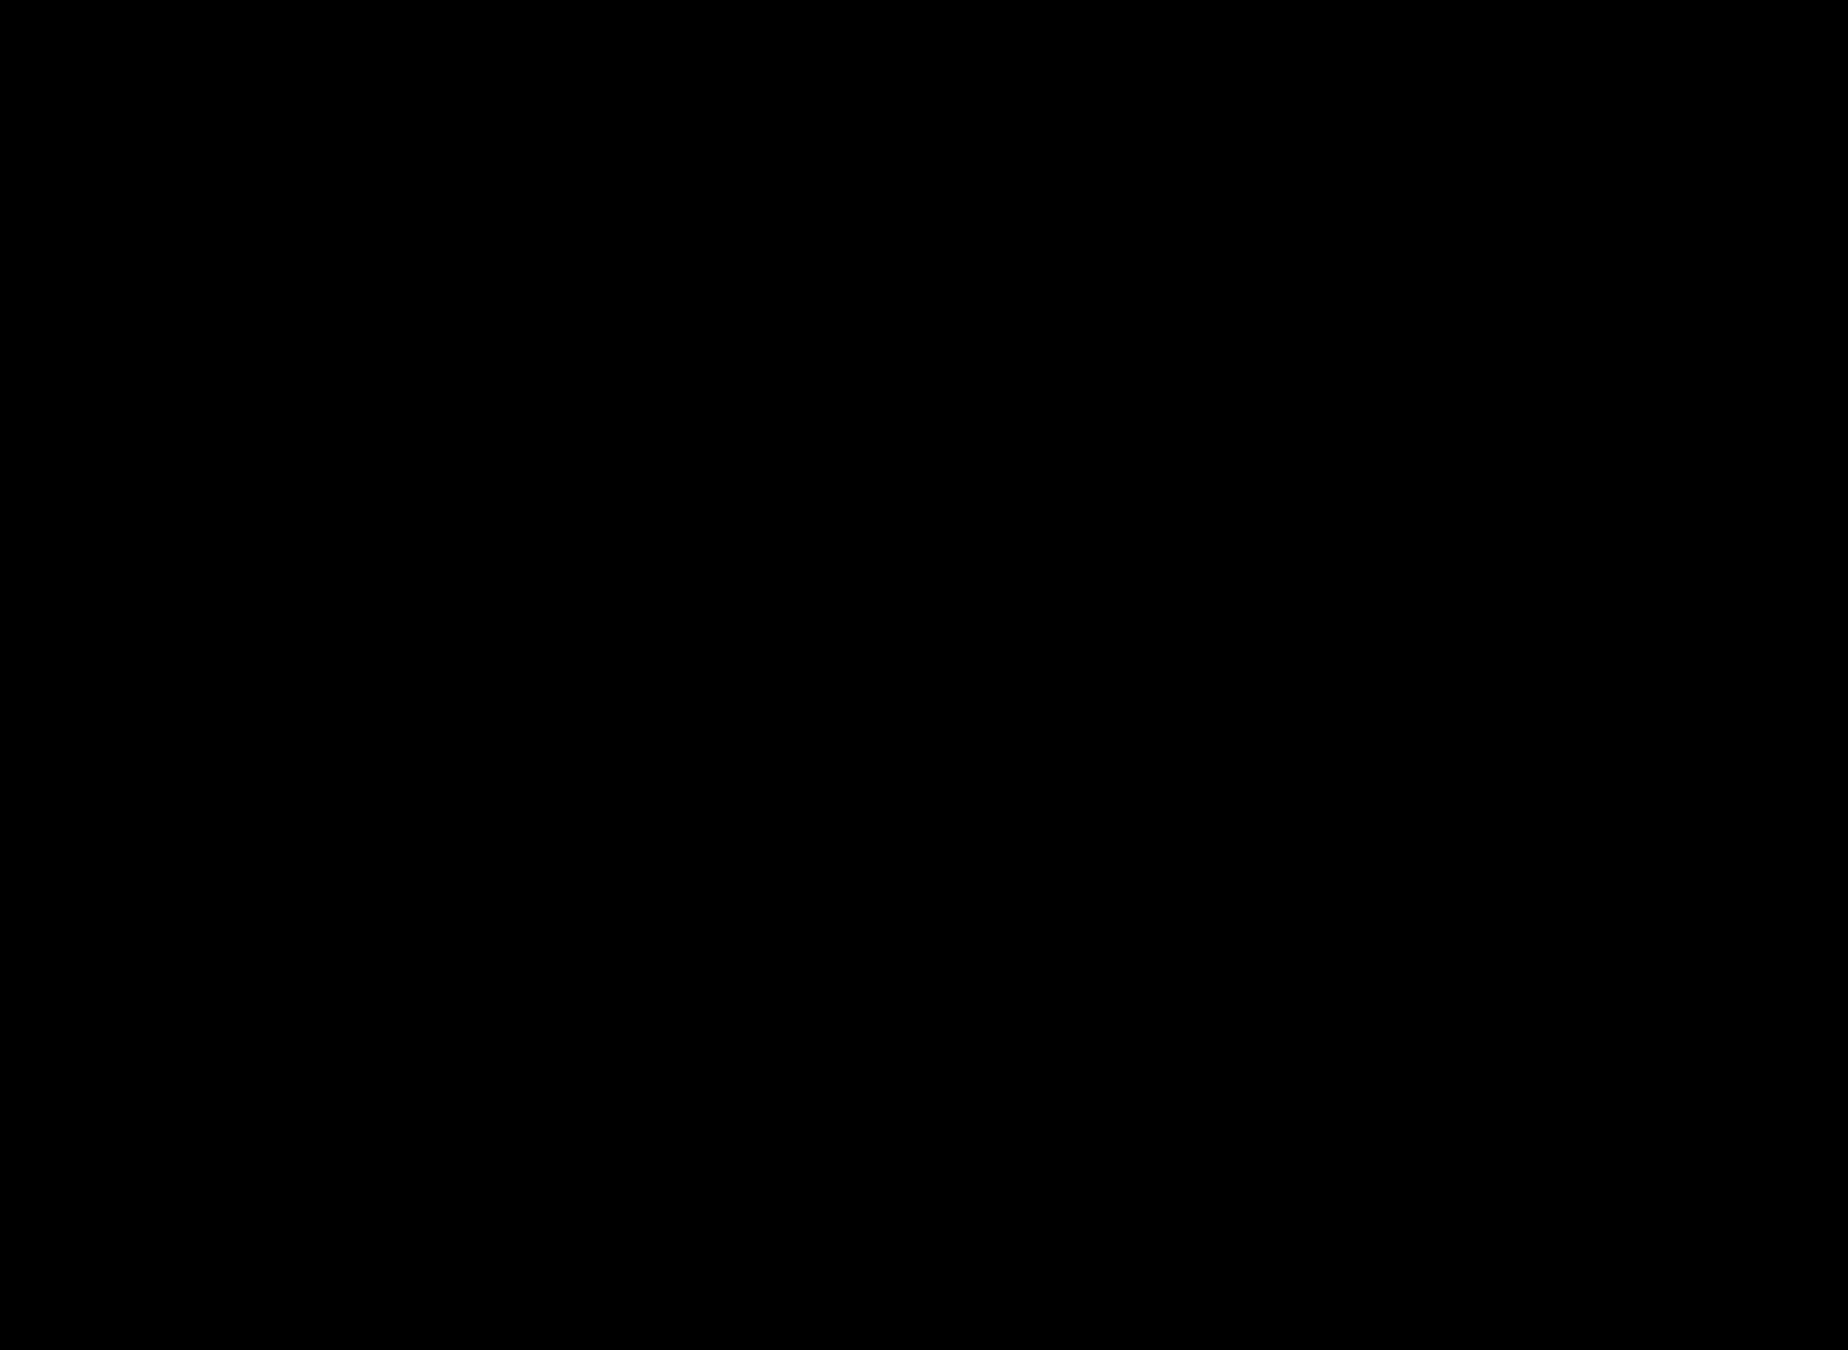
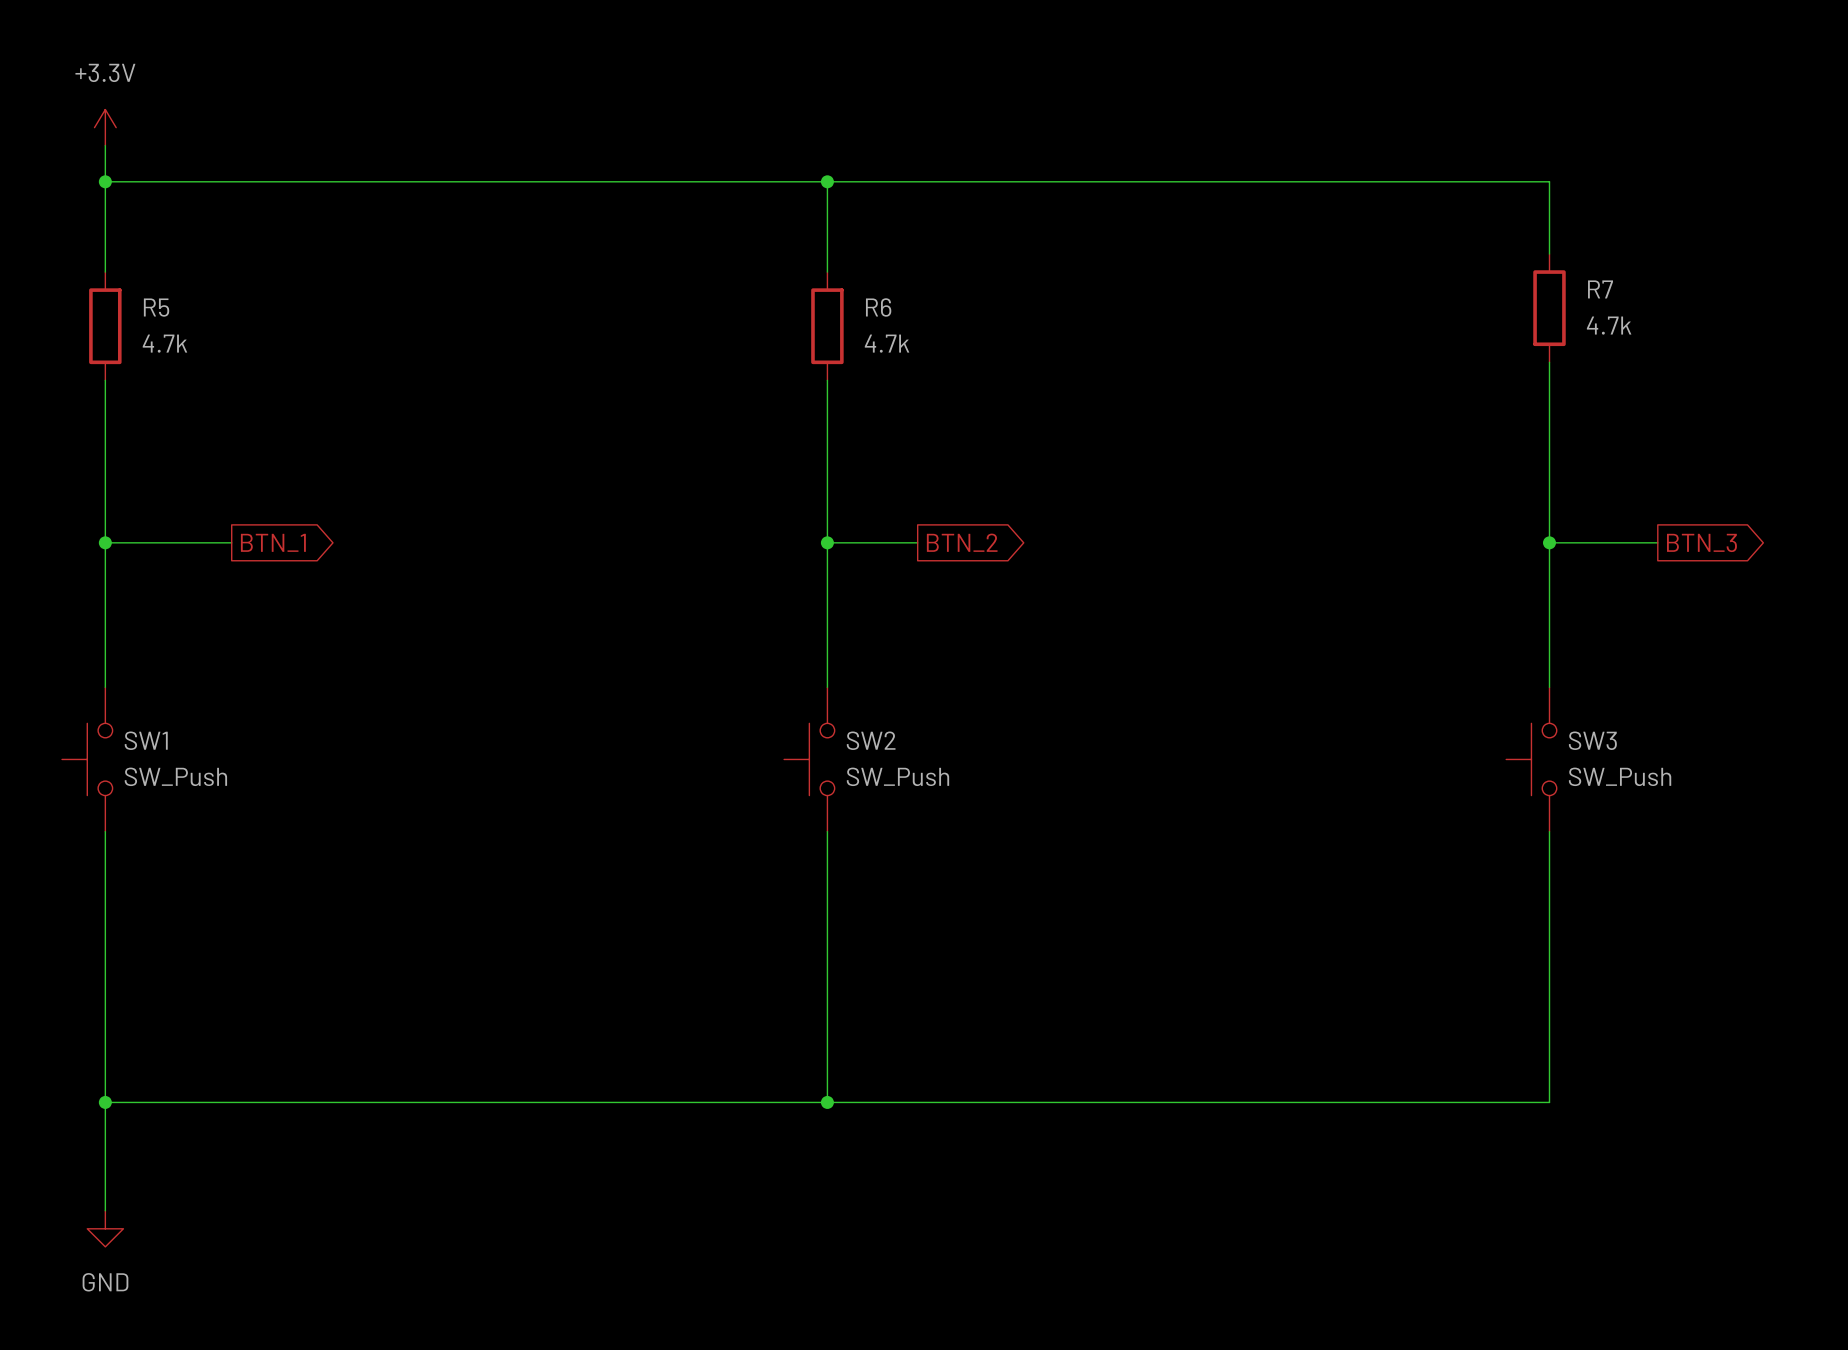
power symbol: none -> +3.3V (105, 127)
wire: none -> (105, 145) (105, 272)
wire: none -> (105, 181) (1549, 181) (1549, 254)
junction: none -> (105, 181)
wire: none -> (827, 181) (827, 272)
junction: none -> (827, 181)
R7: none -> 4.7k (1549, 308)
R5: none -> 4.7k (105, 326)
R6: none -> 4.7k (827, 326)
wire: none -> (1549, 362) (1549, 687)
wire: none -> (105, 380) (105, 687)
wire: none -> (827, 380) (827, 687)
wire: none -> (105, 542) (231, 542)
junction: none -> (105, 542)
global label: none -> BTN_1 (273, 542)
wire: none -> (827, 542) (917, 542)
junction: none -> (827, 542)
global label: none -> BTN_2 (962, 542)
wire: none -> (1549, 542) (1657, 542)
junction: none -> (1549, 542)
global label: none -> BTN_3 (1701, 542)
SW1: none -> SW_Push (87, 759)
SW2: none -> SW_Push (809, 759)
SW3: none -> SW_Push (1531, 759)
wire: none -> (105, 831) (105, 1210)
wire: none -> (827, 831) (827, 1102)
wire: none -> (1549, 831) (1549, 1102) (105, 1102)
junction: none -> (105, 1102)
junction: none -> (827, 1102)
power symbol: none -> GND (105, 1228)

